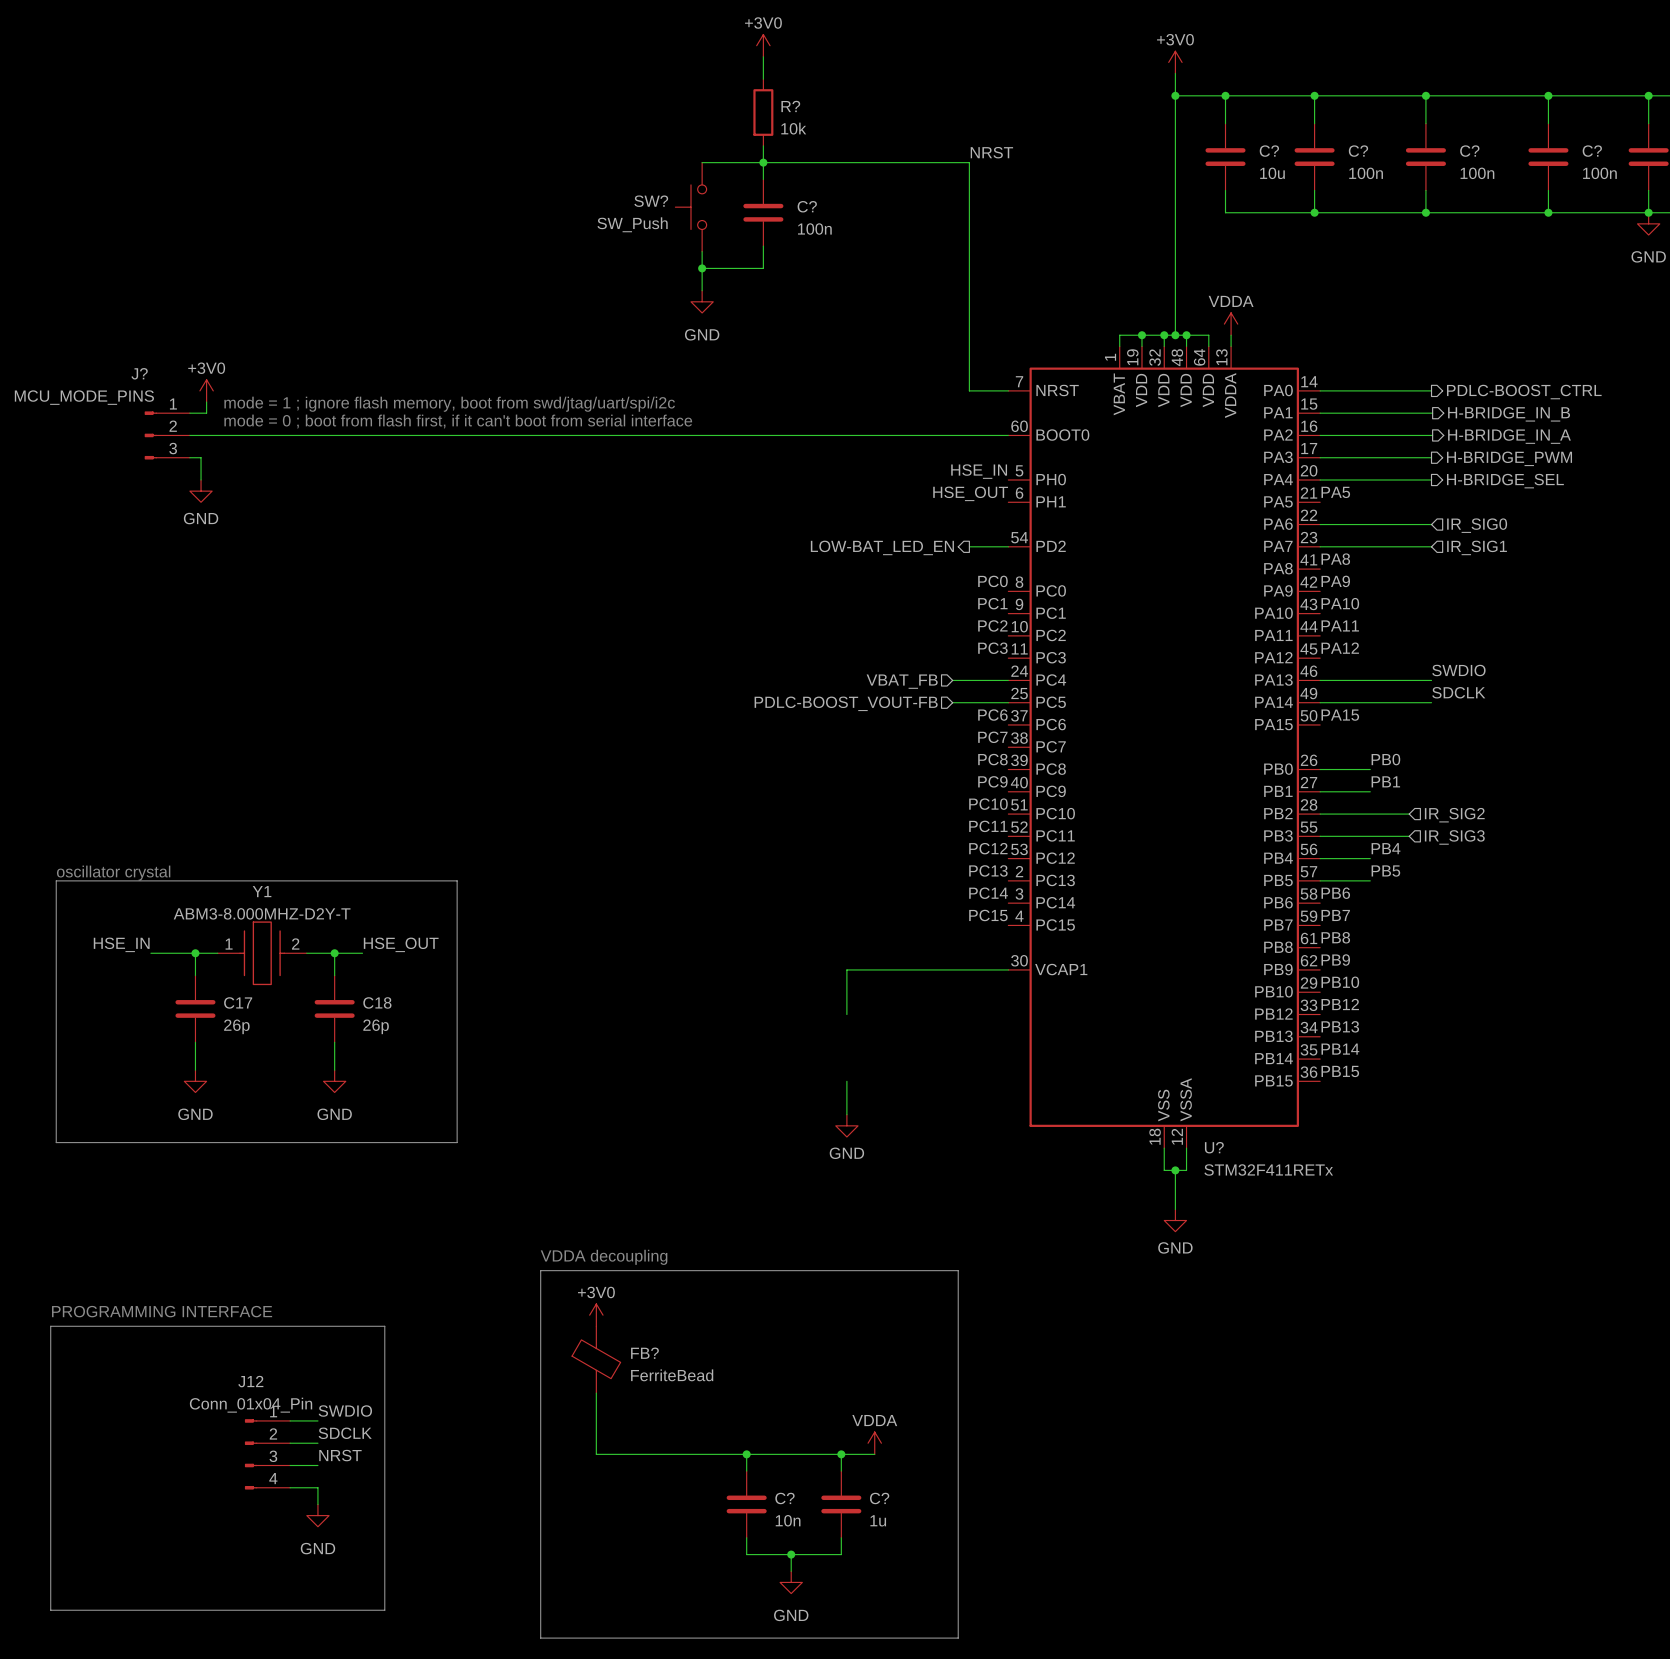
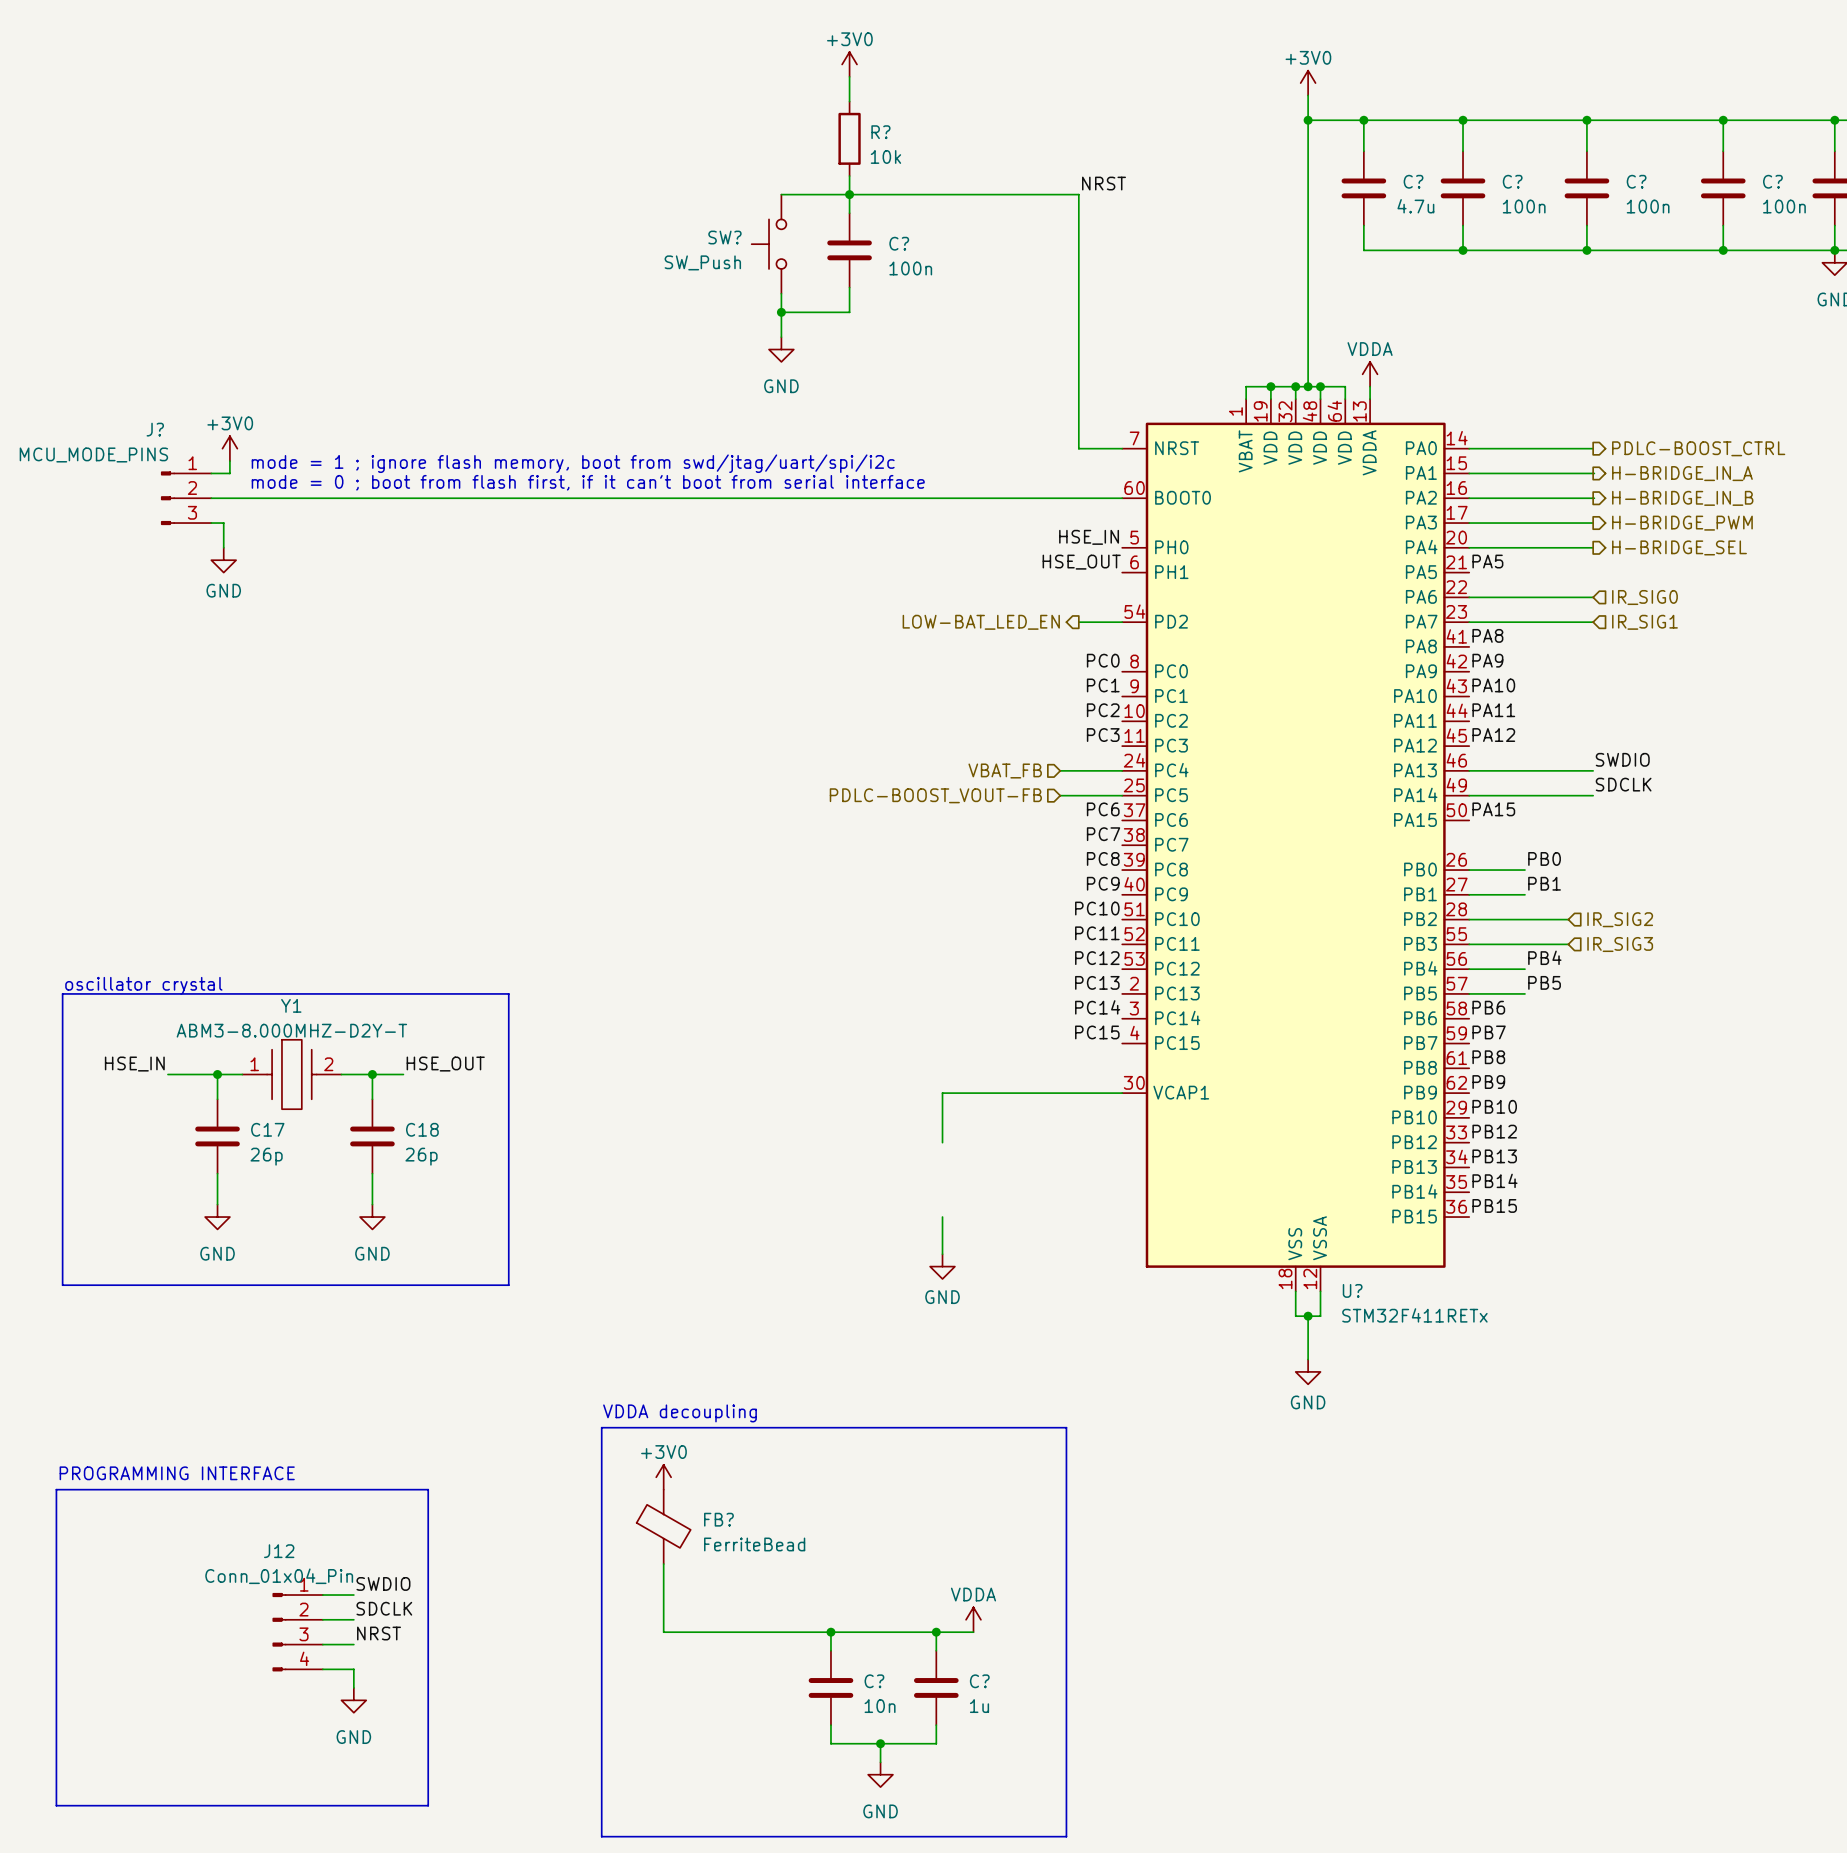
C? value: 10u (1272, 173) -> 4.7u (1415, 206)
hierarchical label position: H-BRIDGE_IN_B (1509, 414) -> H-BRIDGE_IN_B (1682, 498)
hierarchical label position: H-BRIDGE_IN_A (1509, 436) -> H-BRIDGE_IN_A (1682, 473)

